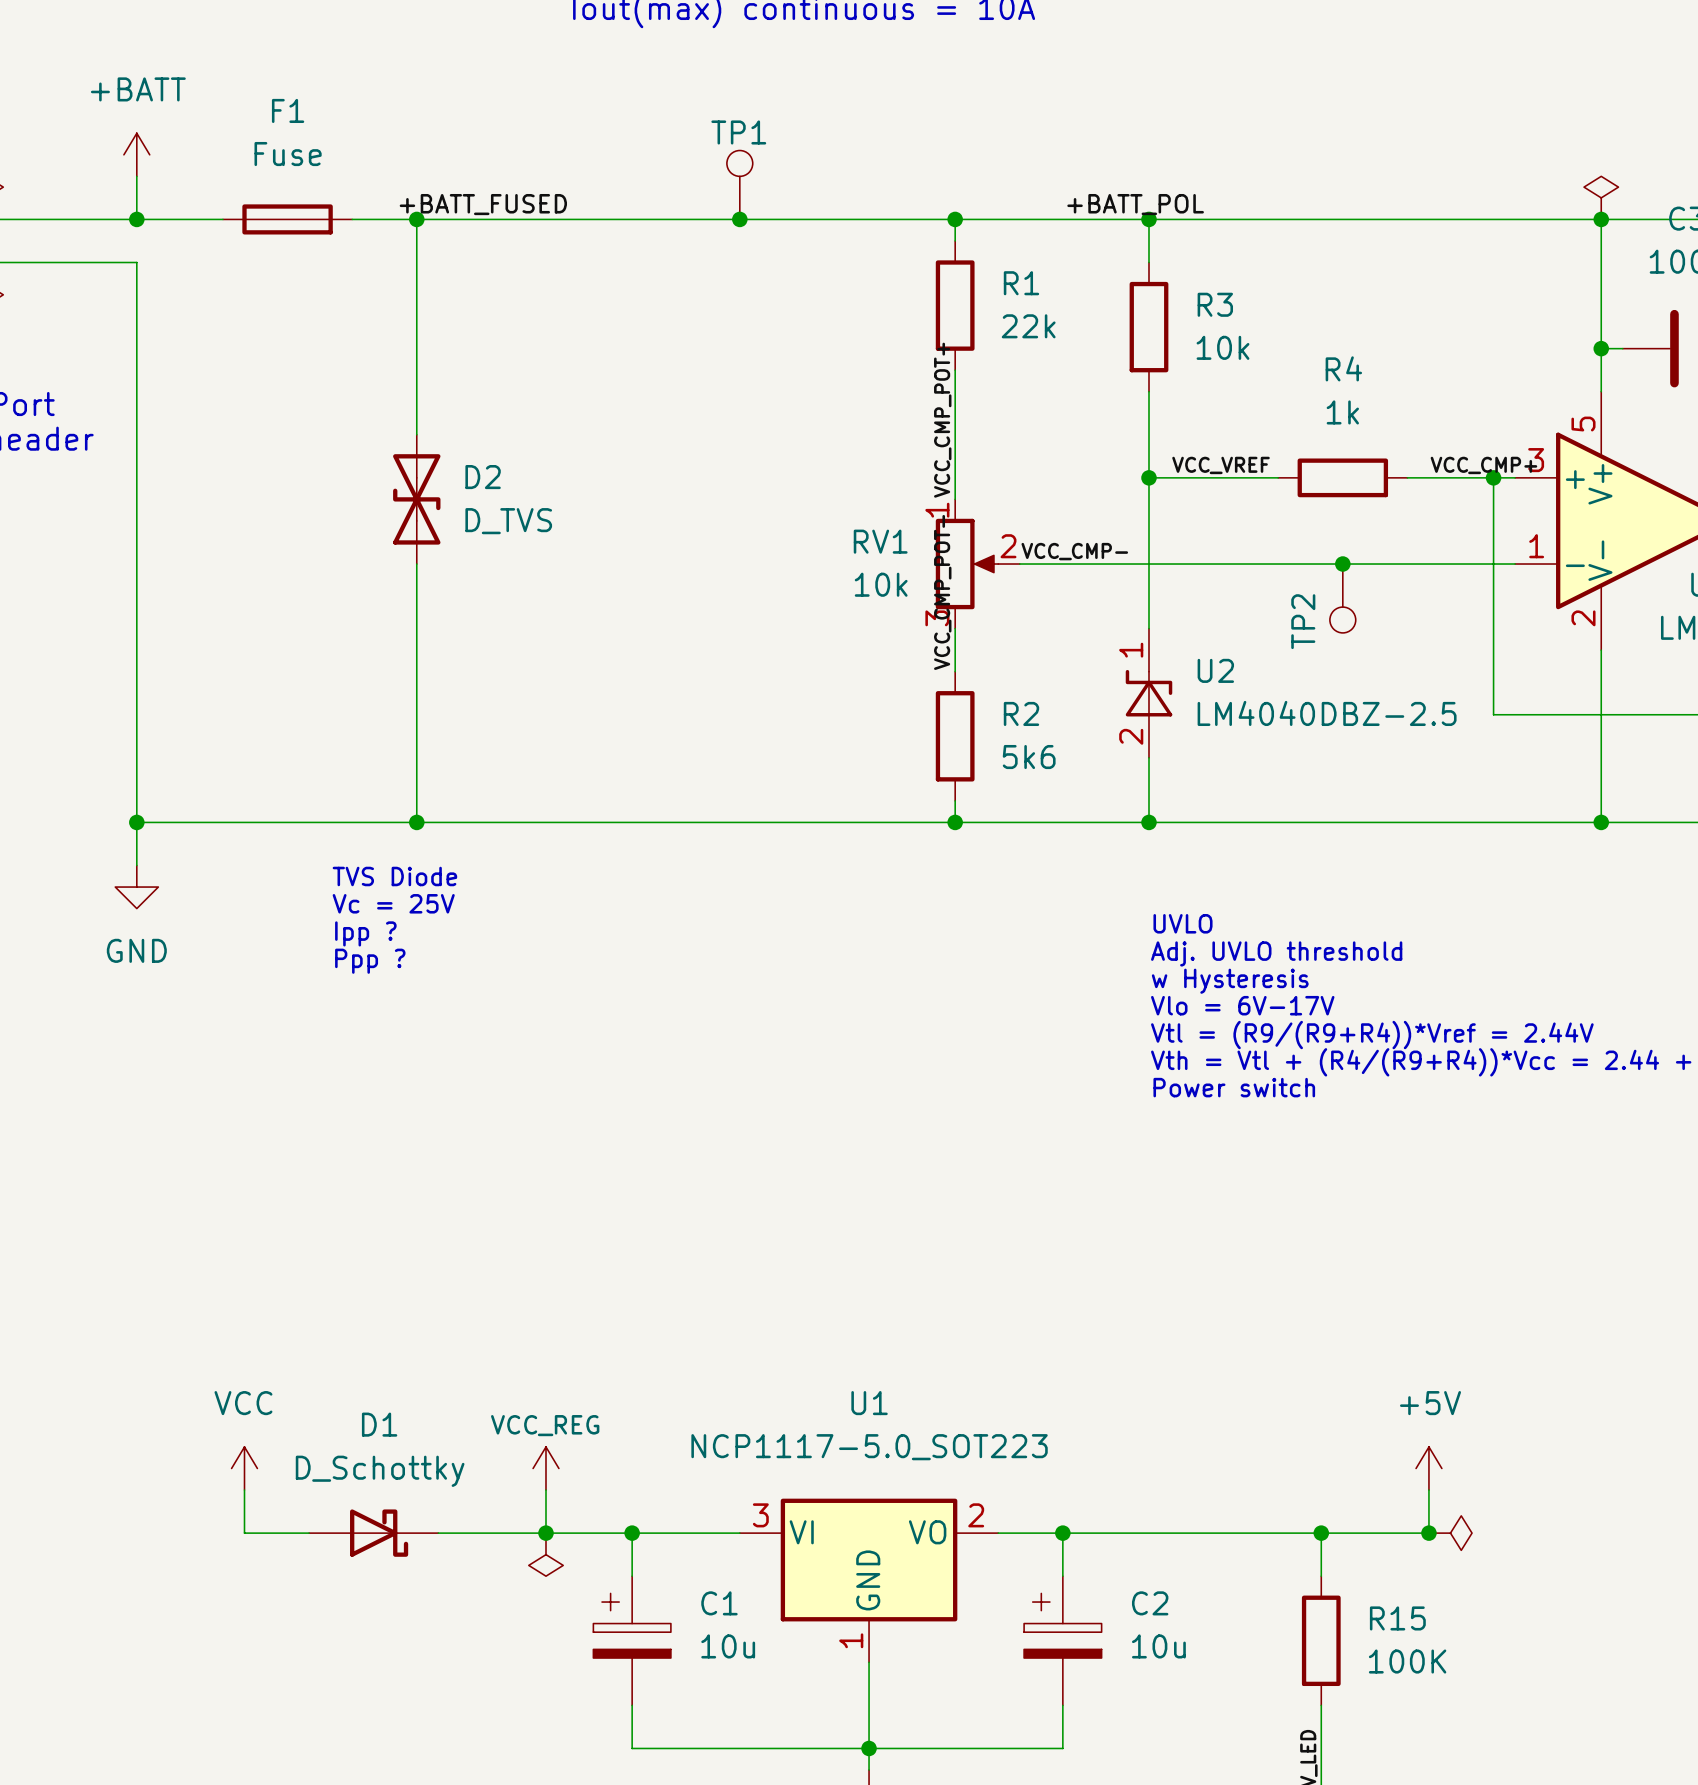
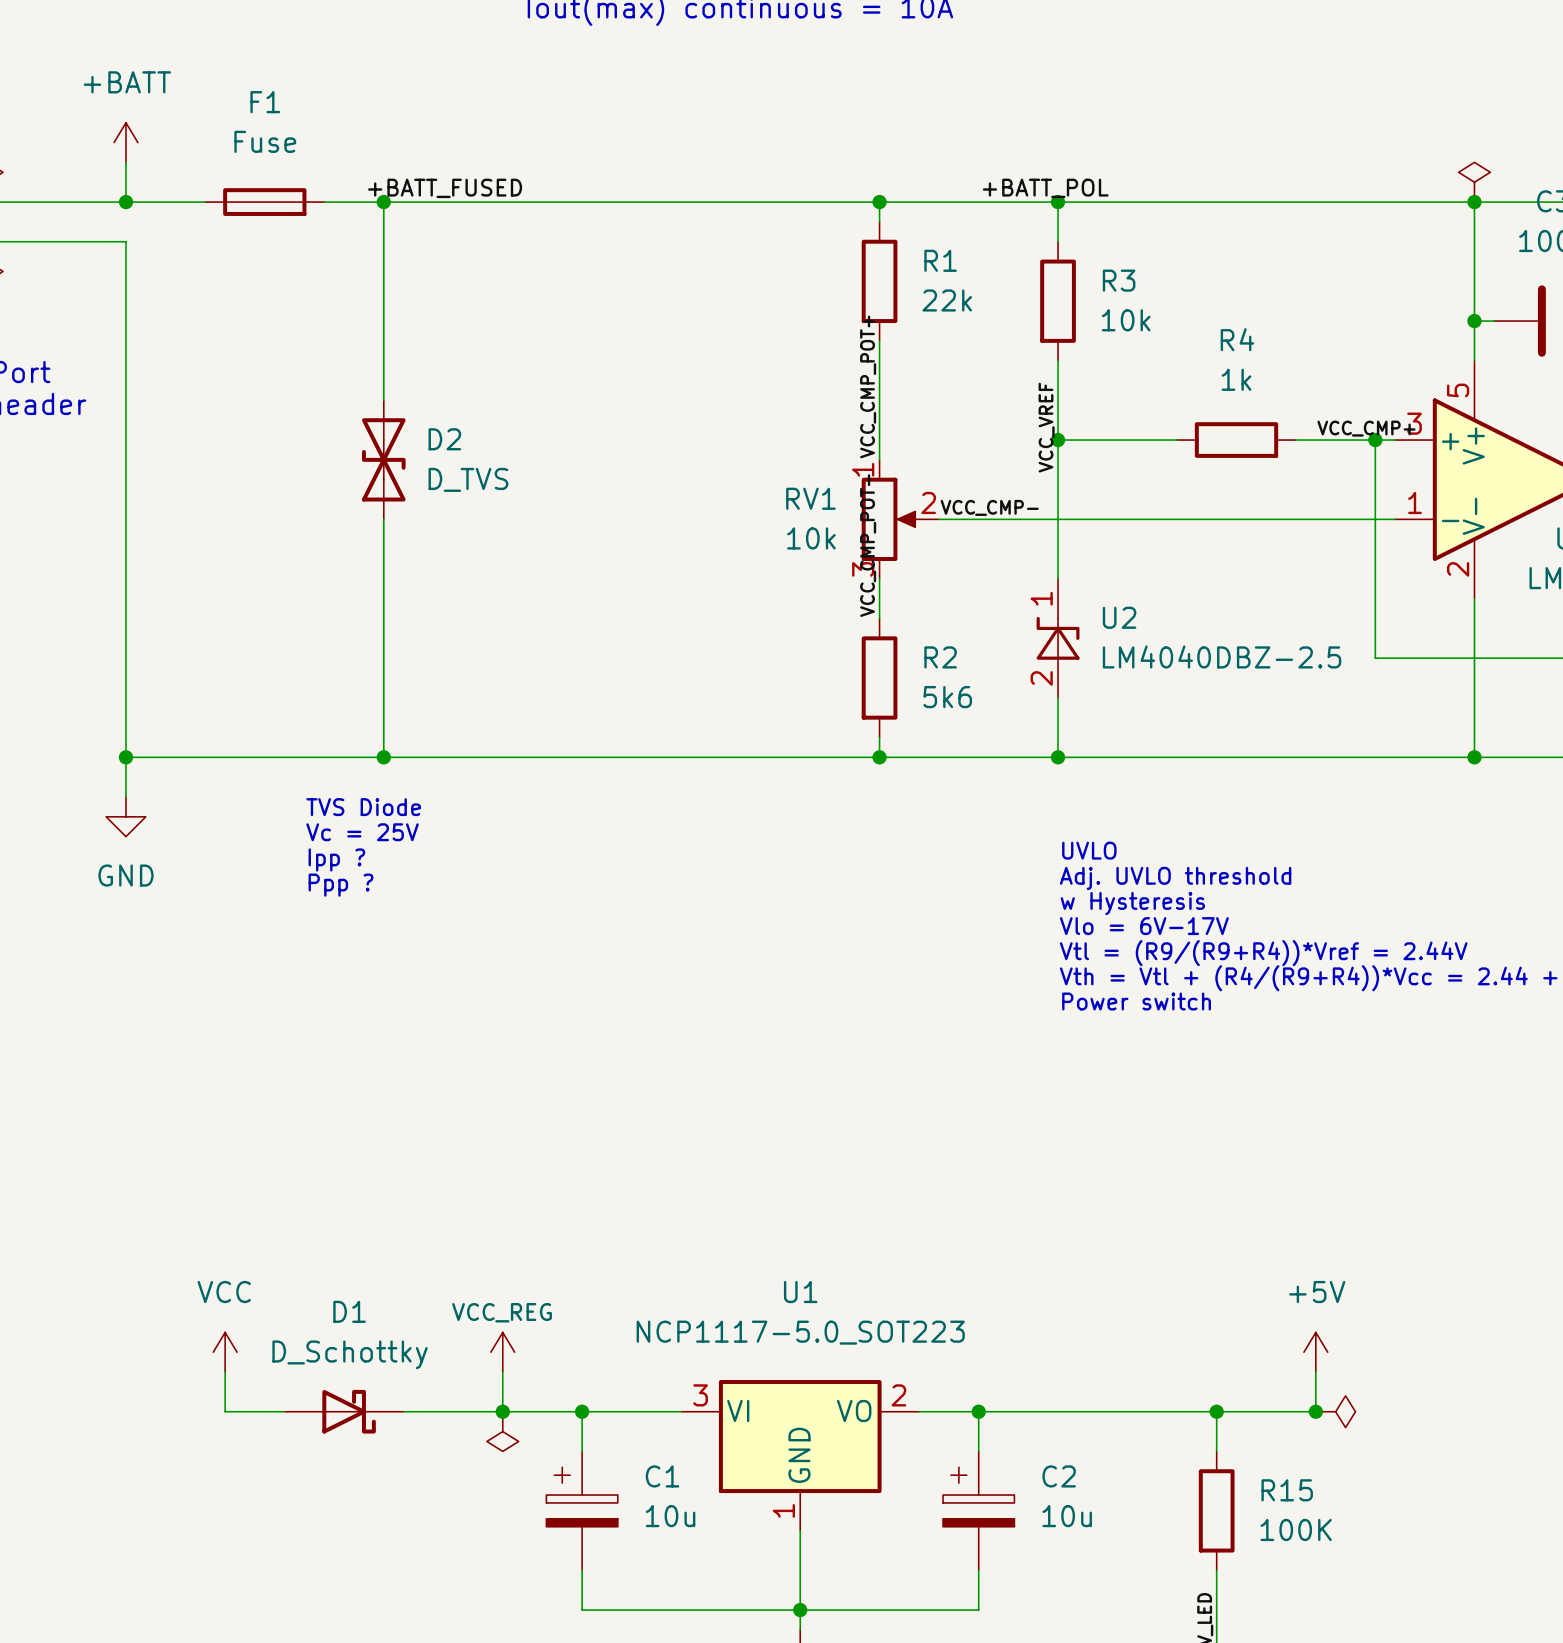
TP1: (739, 184) -> none
junction: (739, 219) -> none
label rotation: 0° (1221, 465) -> 90° counterclockwise (1046, 427)
junction: (1342, 564) -> none
TP2: (1342, 598) -> none

